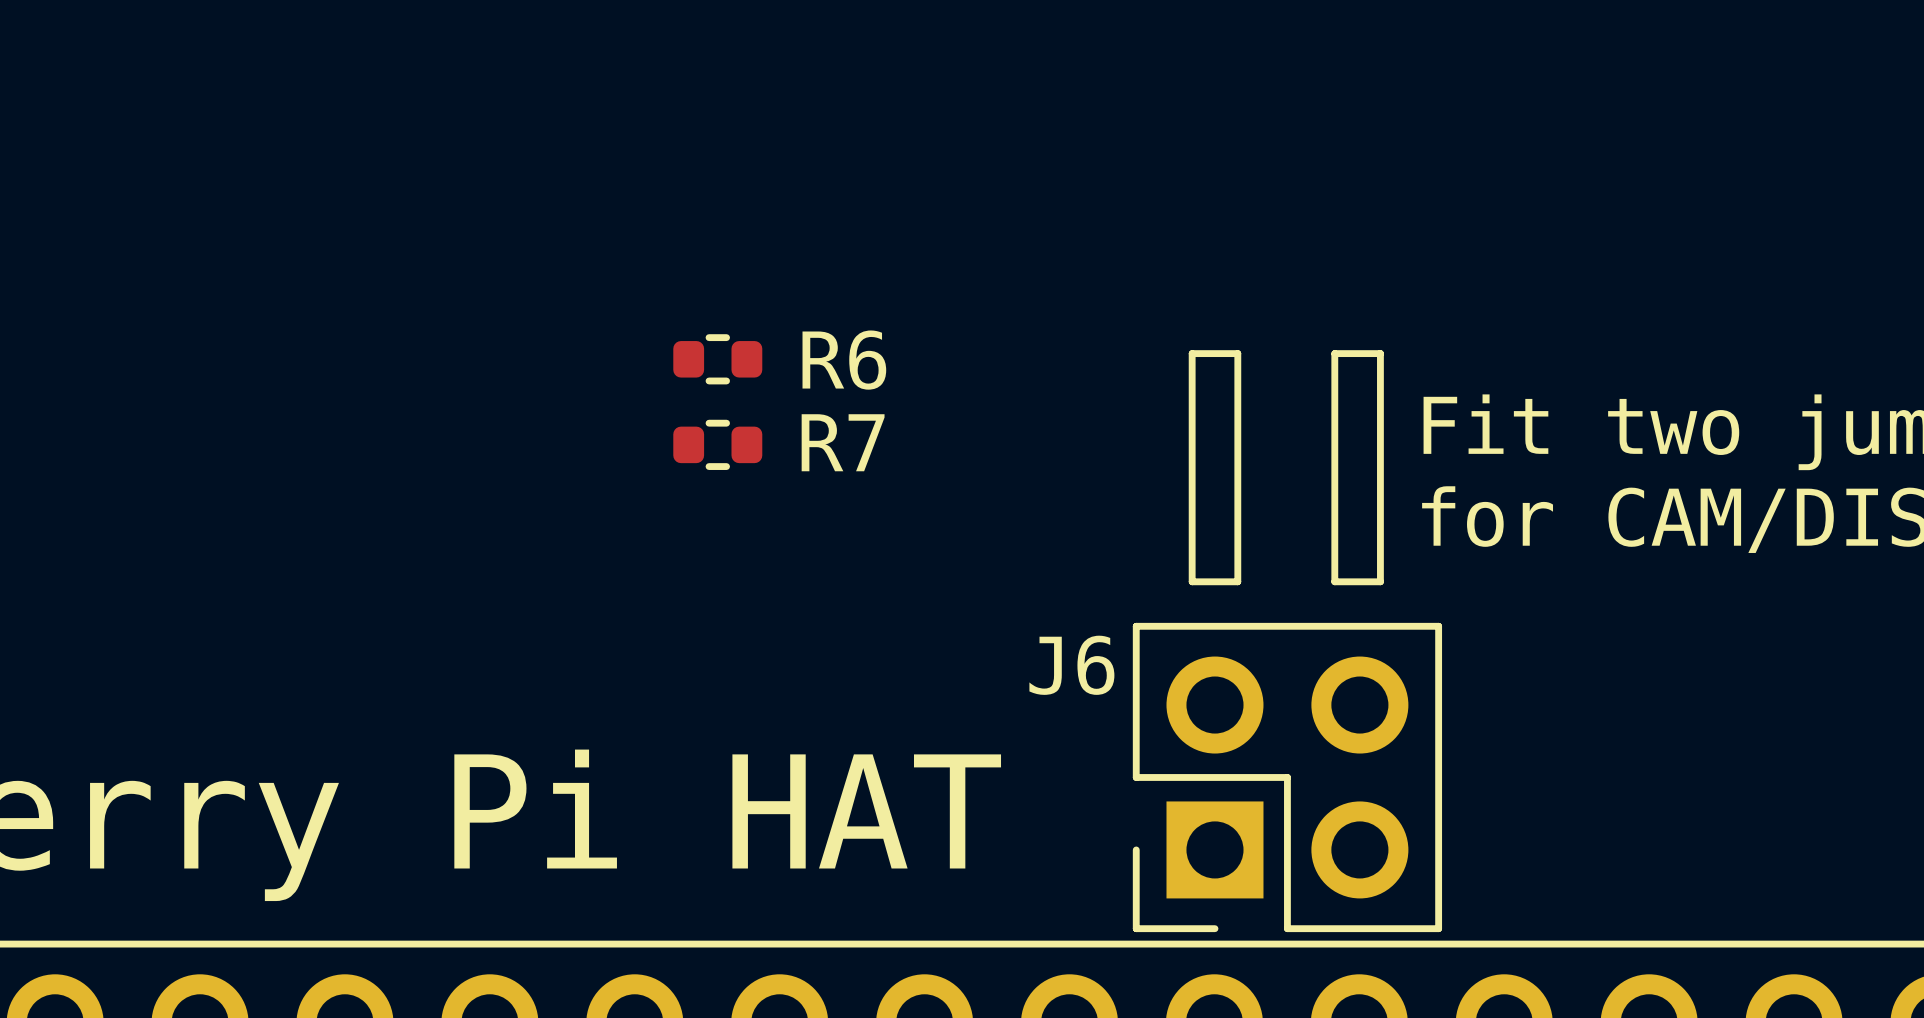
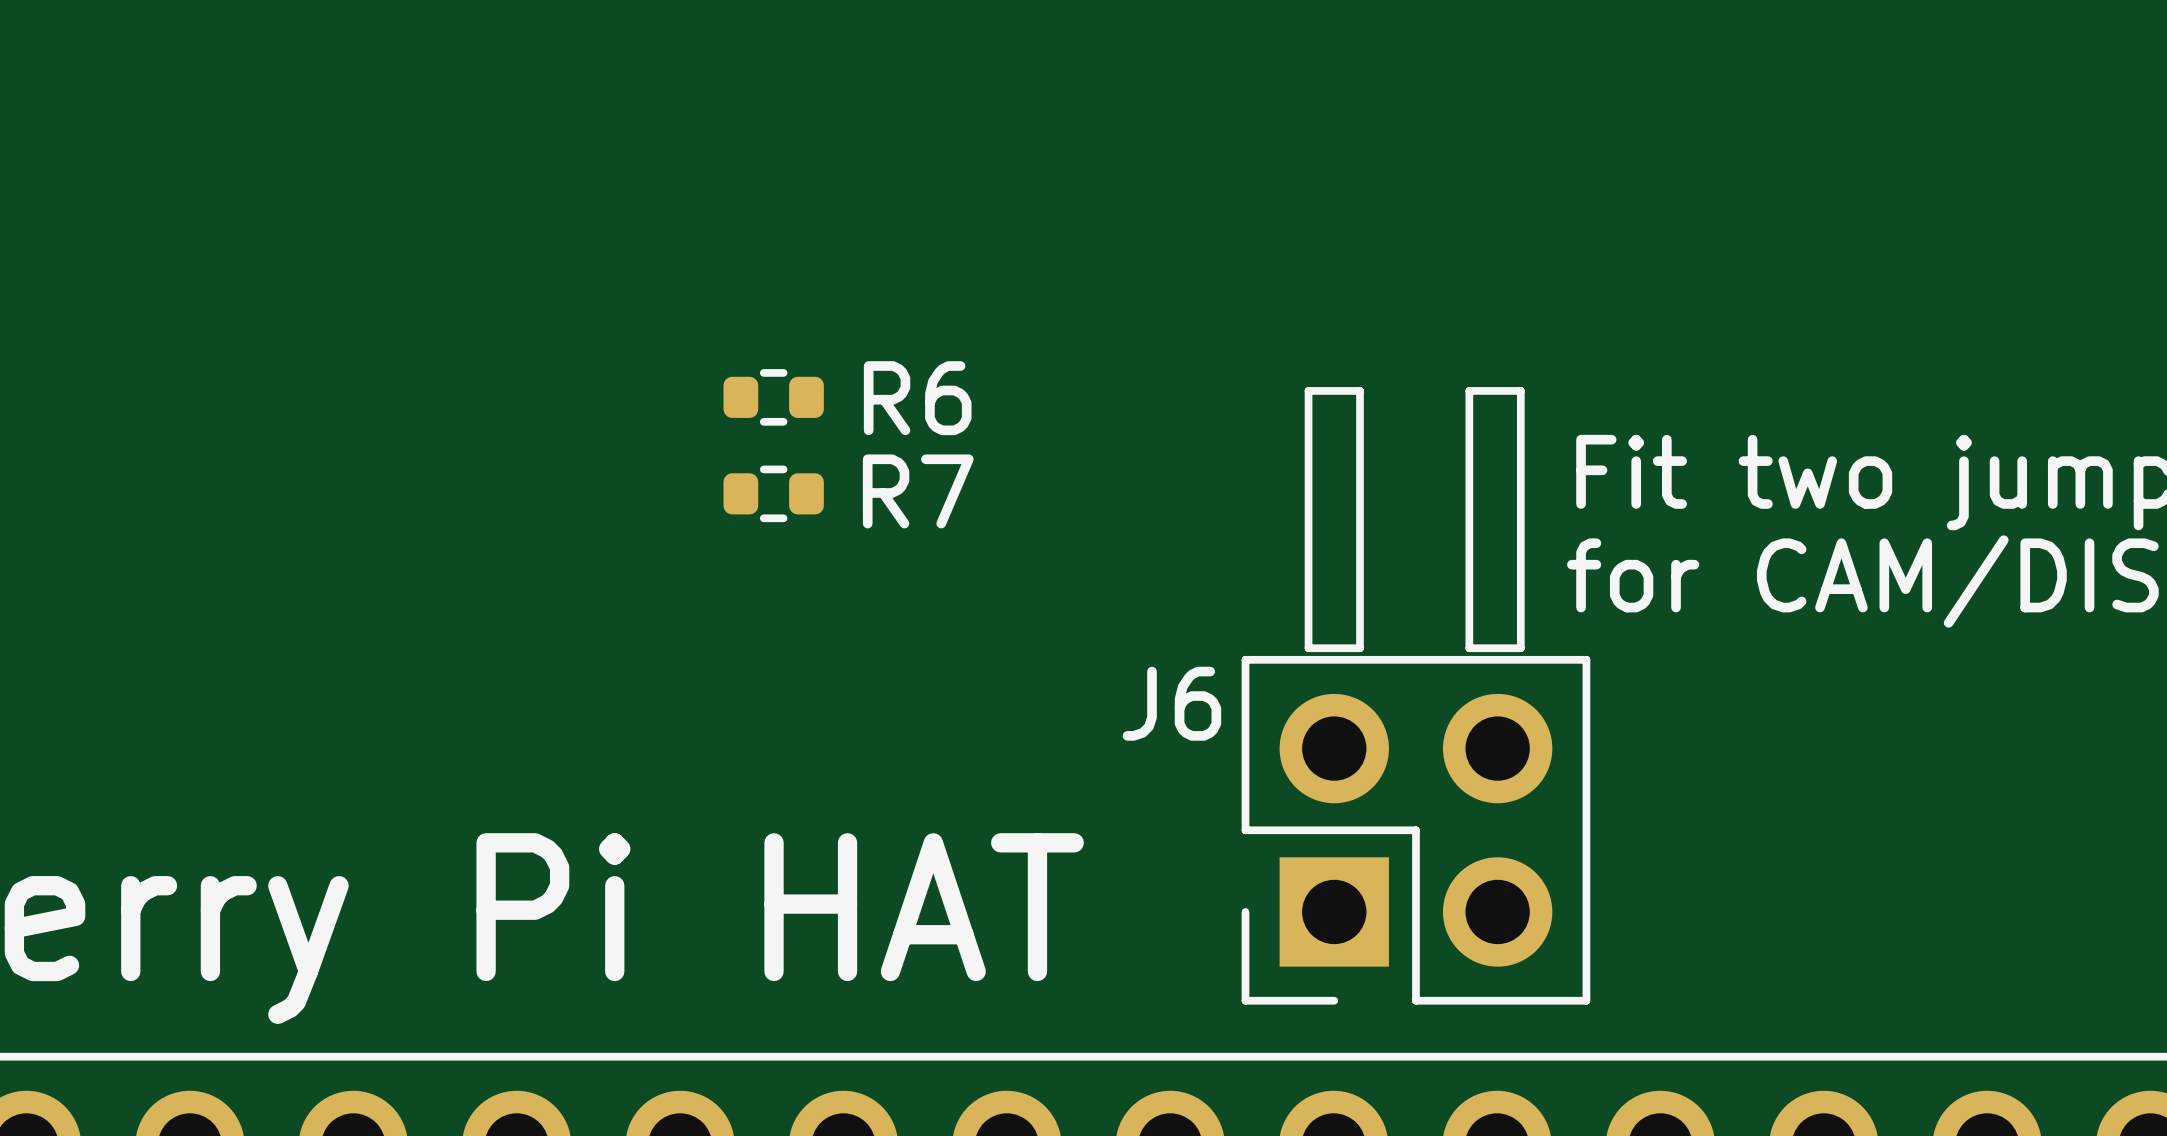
J6 position: (1287, 777) -> (1415, 830)

